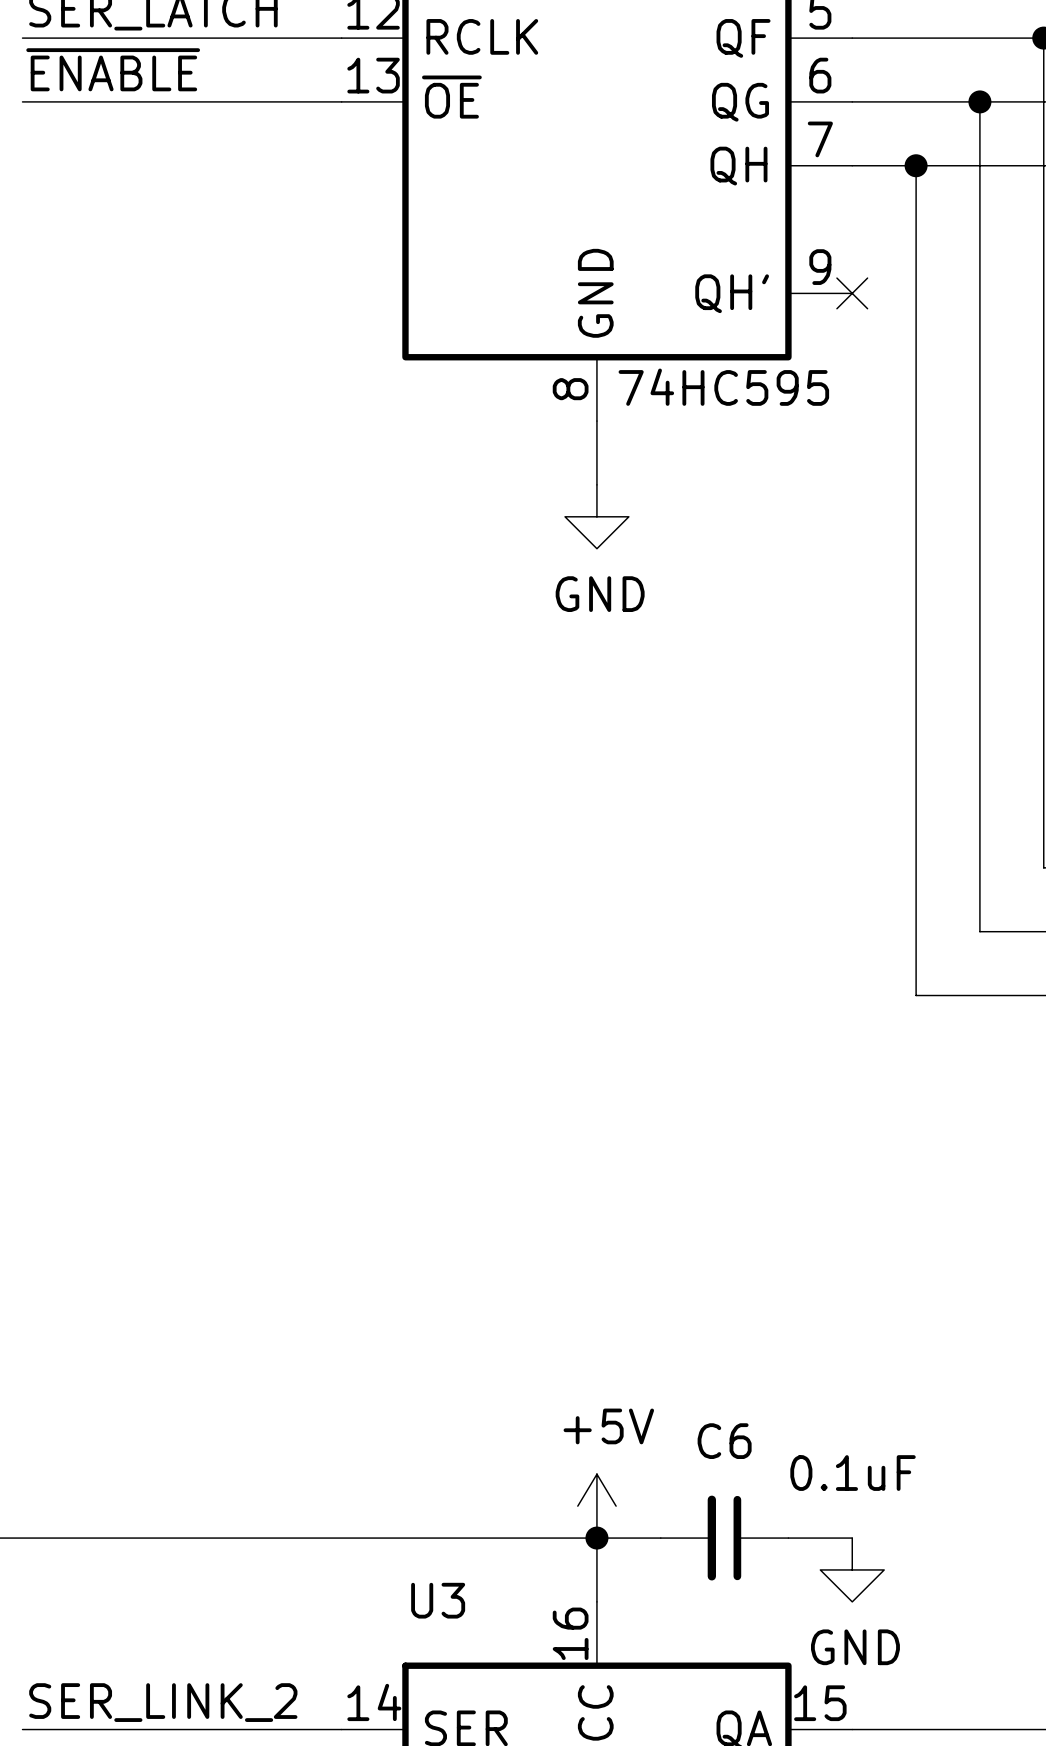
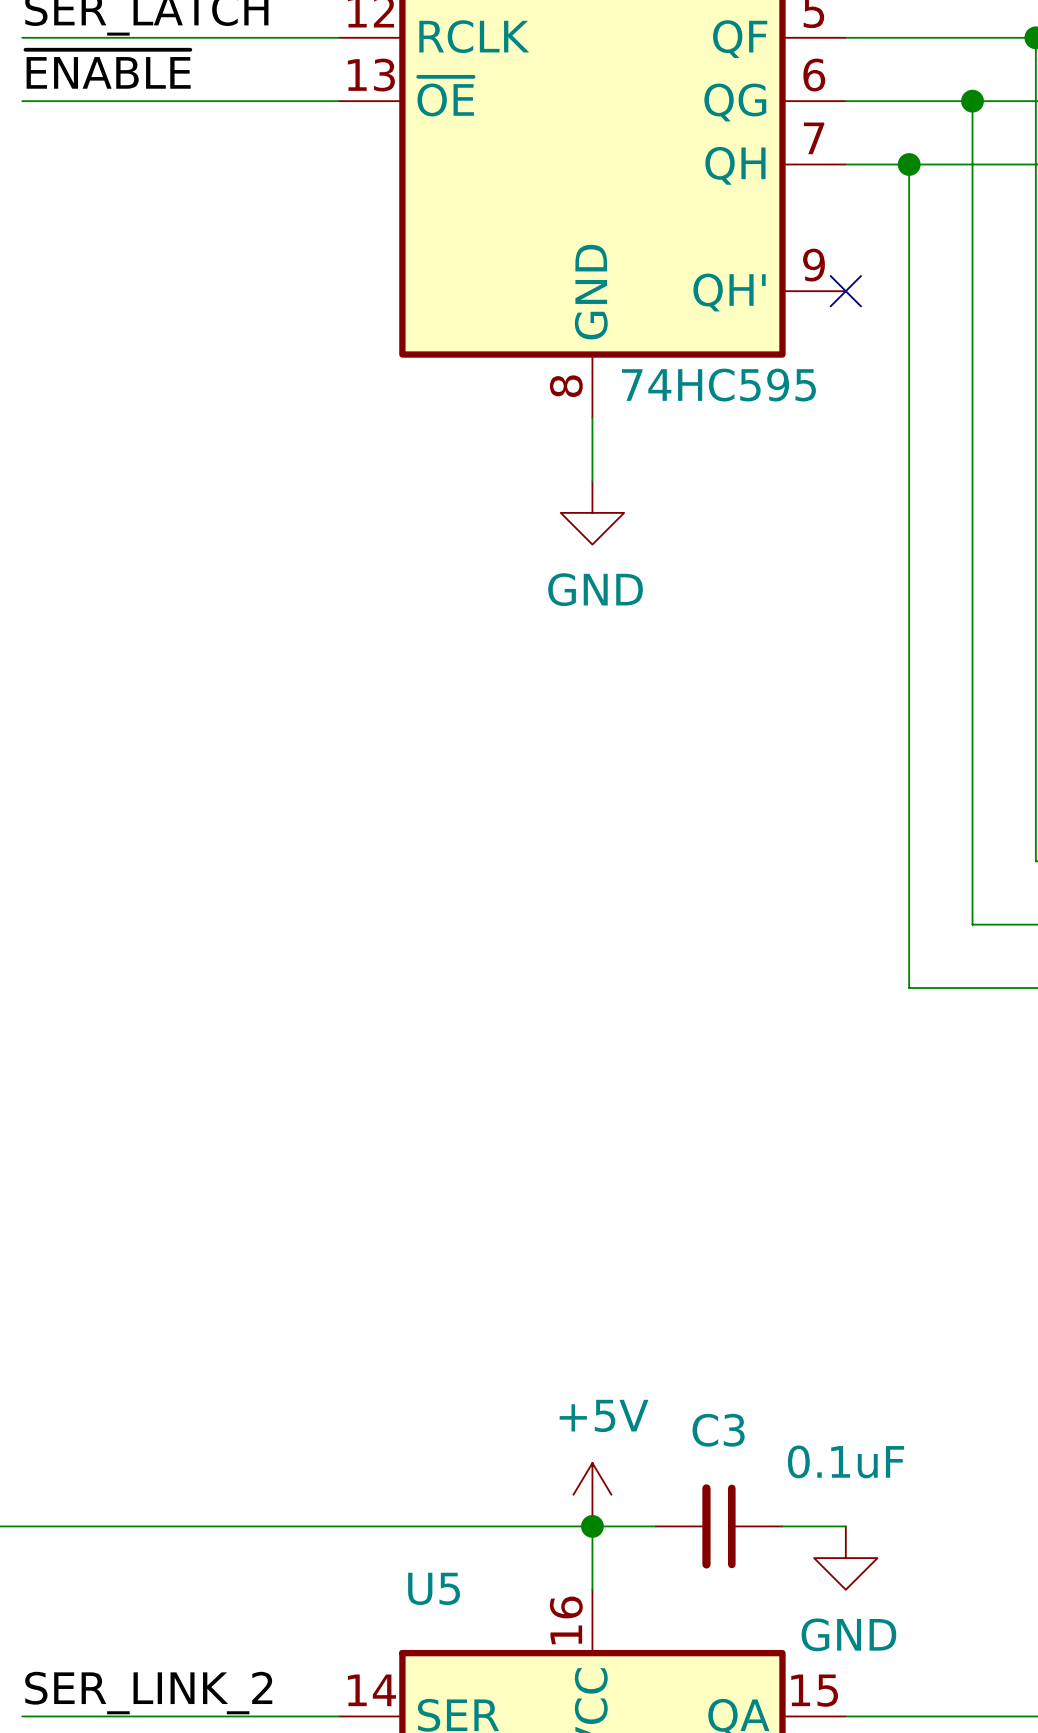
C6 name: C6 (724, 1441) -> C3 (718, 1430)
U3 name: U3 (438, 1600) -> U5 (434, 1588)

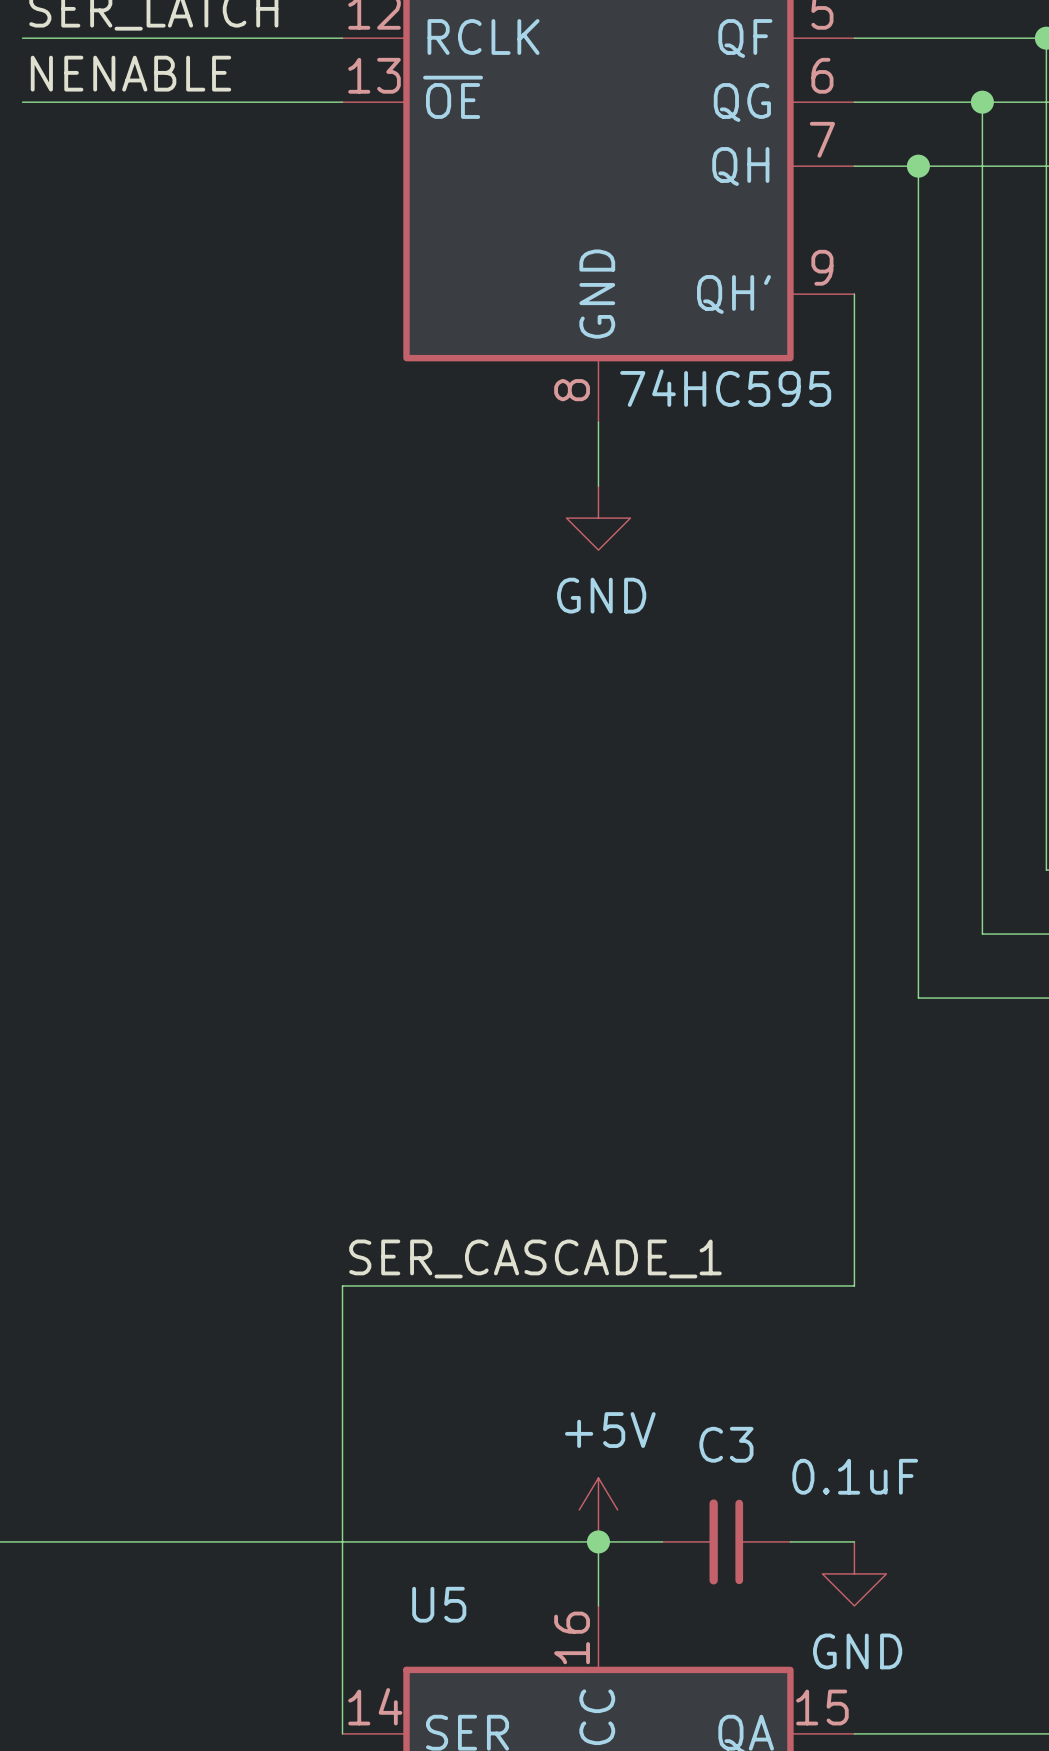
label: ~{ENABLE} (108, 69) -> NENABLE (130, 73)
no-connect mark: (845, 291) -> none
label: none -> SER_CASCADE_1 (535, 1258)
label: SER_LINK_2 (148, 1693) -> none
wire: (22, 1716) (339, 1716) -> (854, 294) (854, 1285) (342, 1285) (342, 1733)

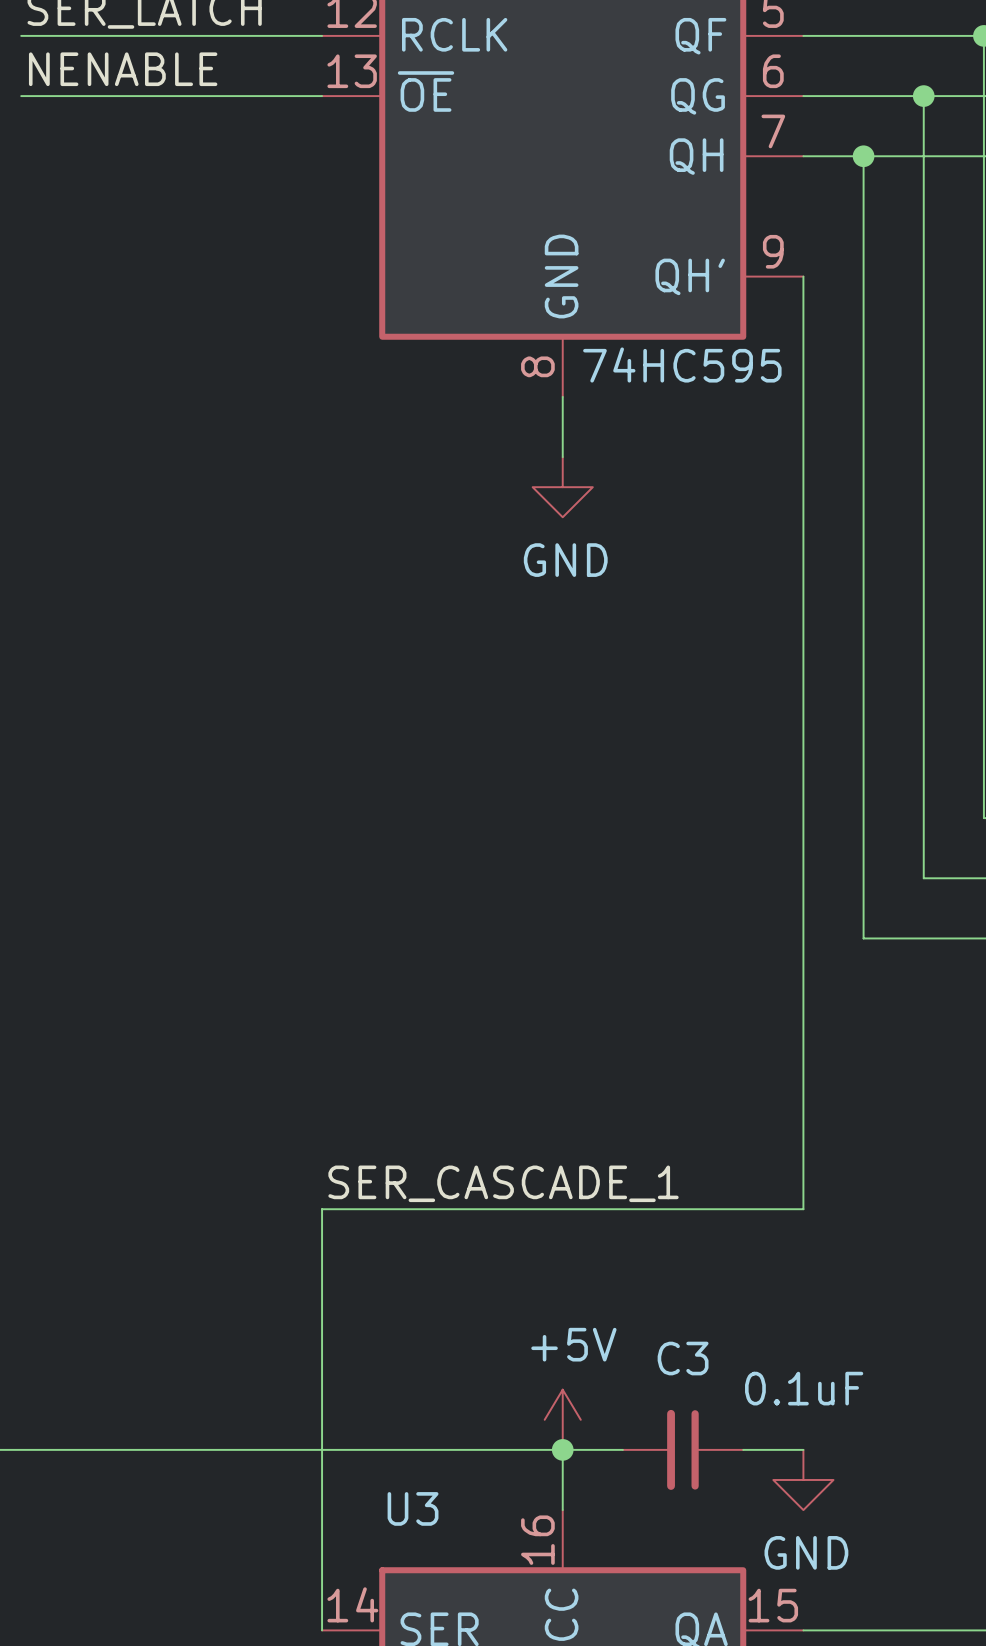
U5 name: U5 (439, 1604) -> U3 (413, 1508)

